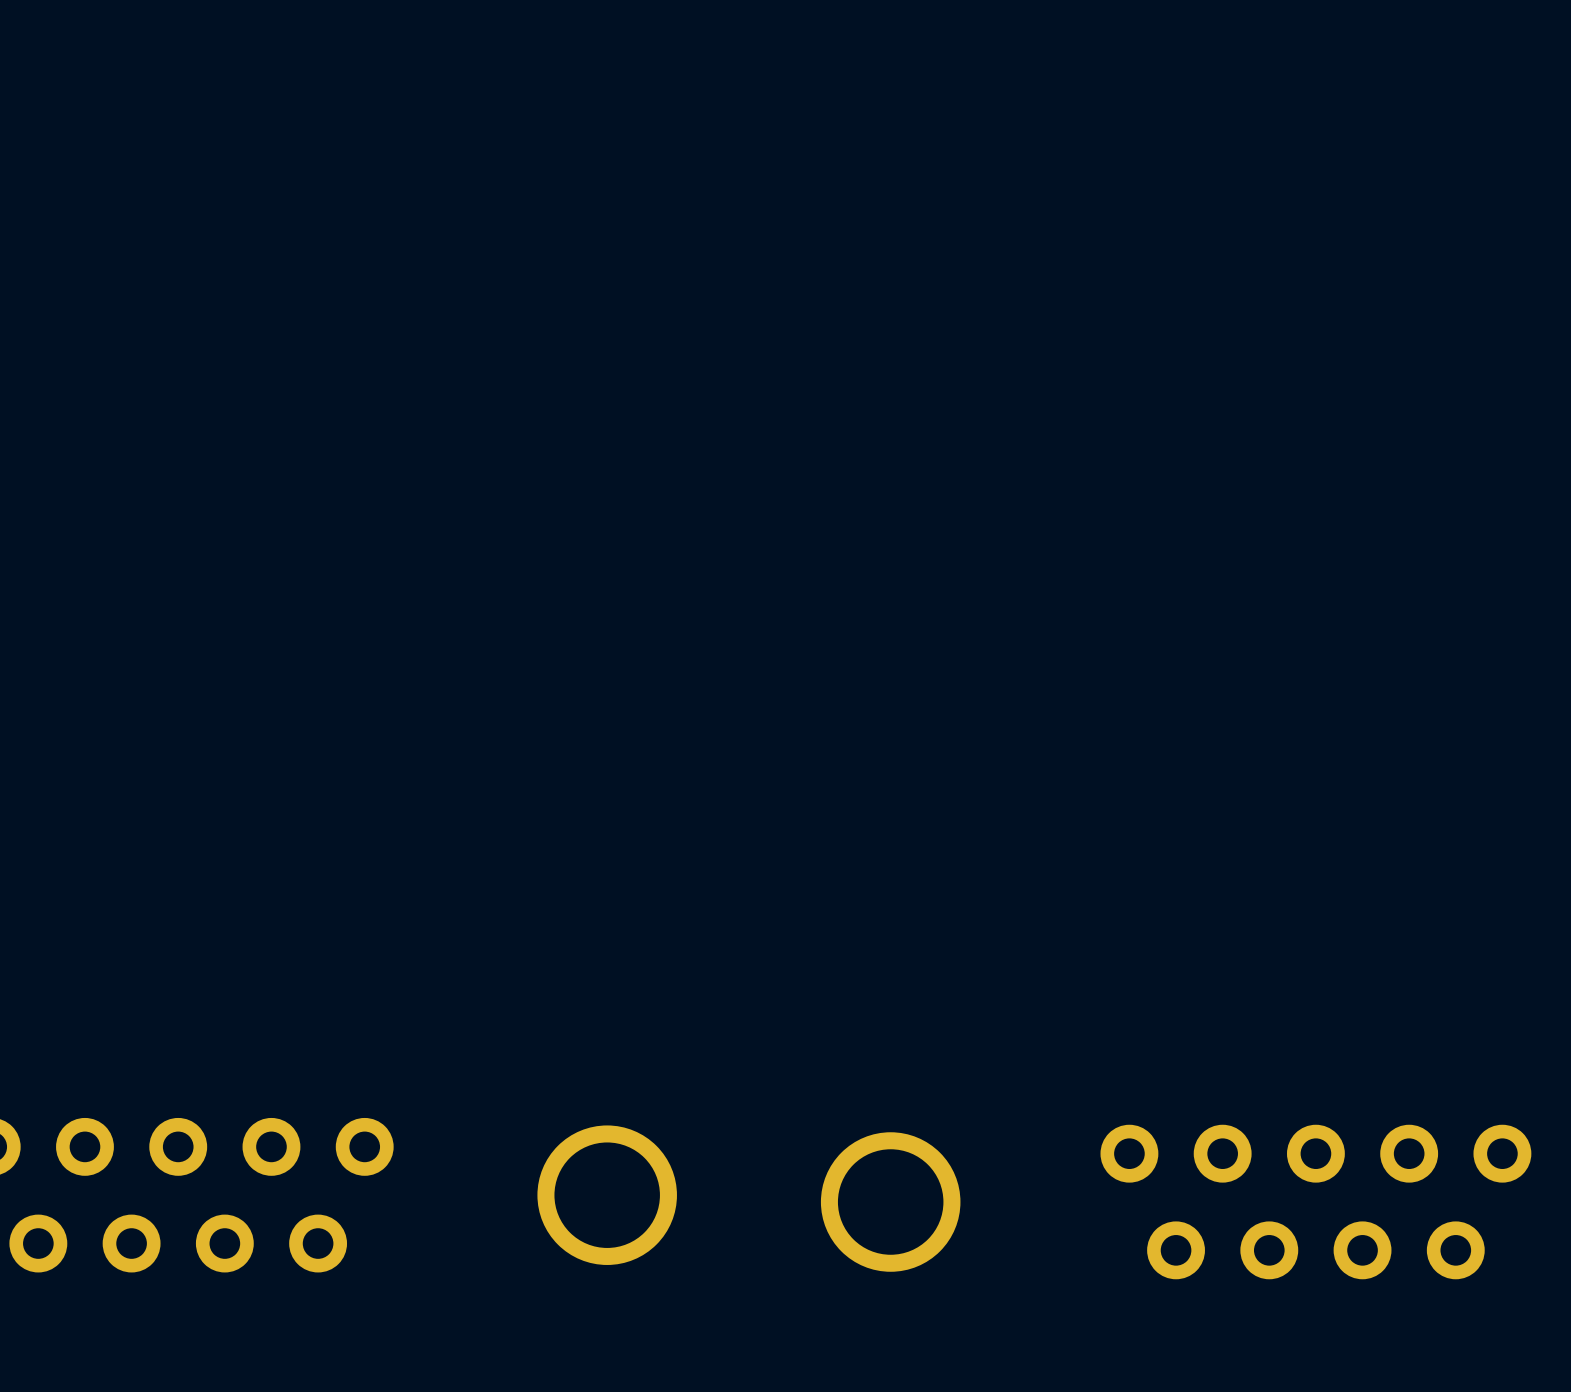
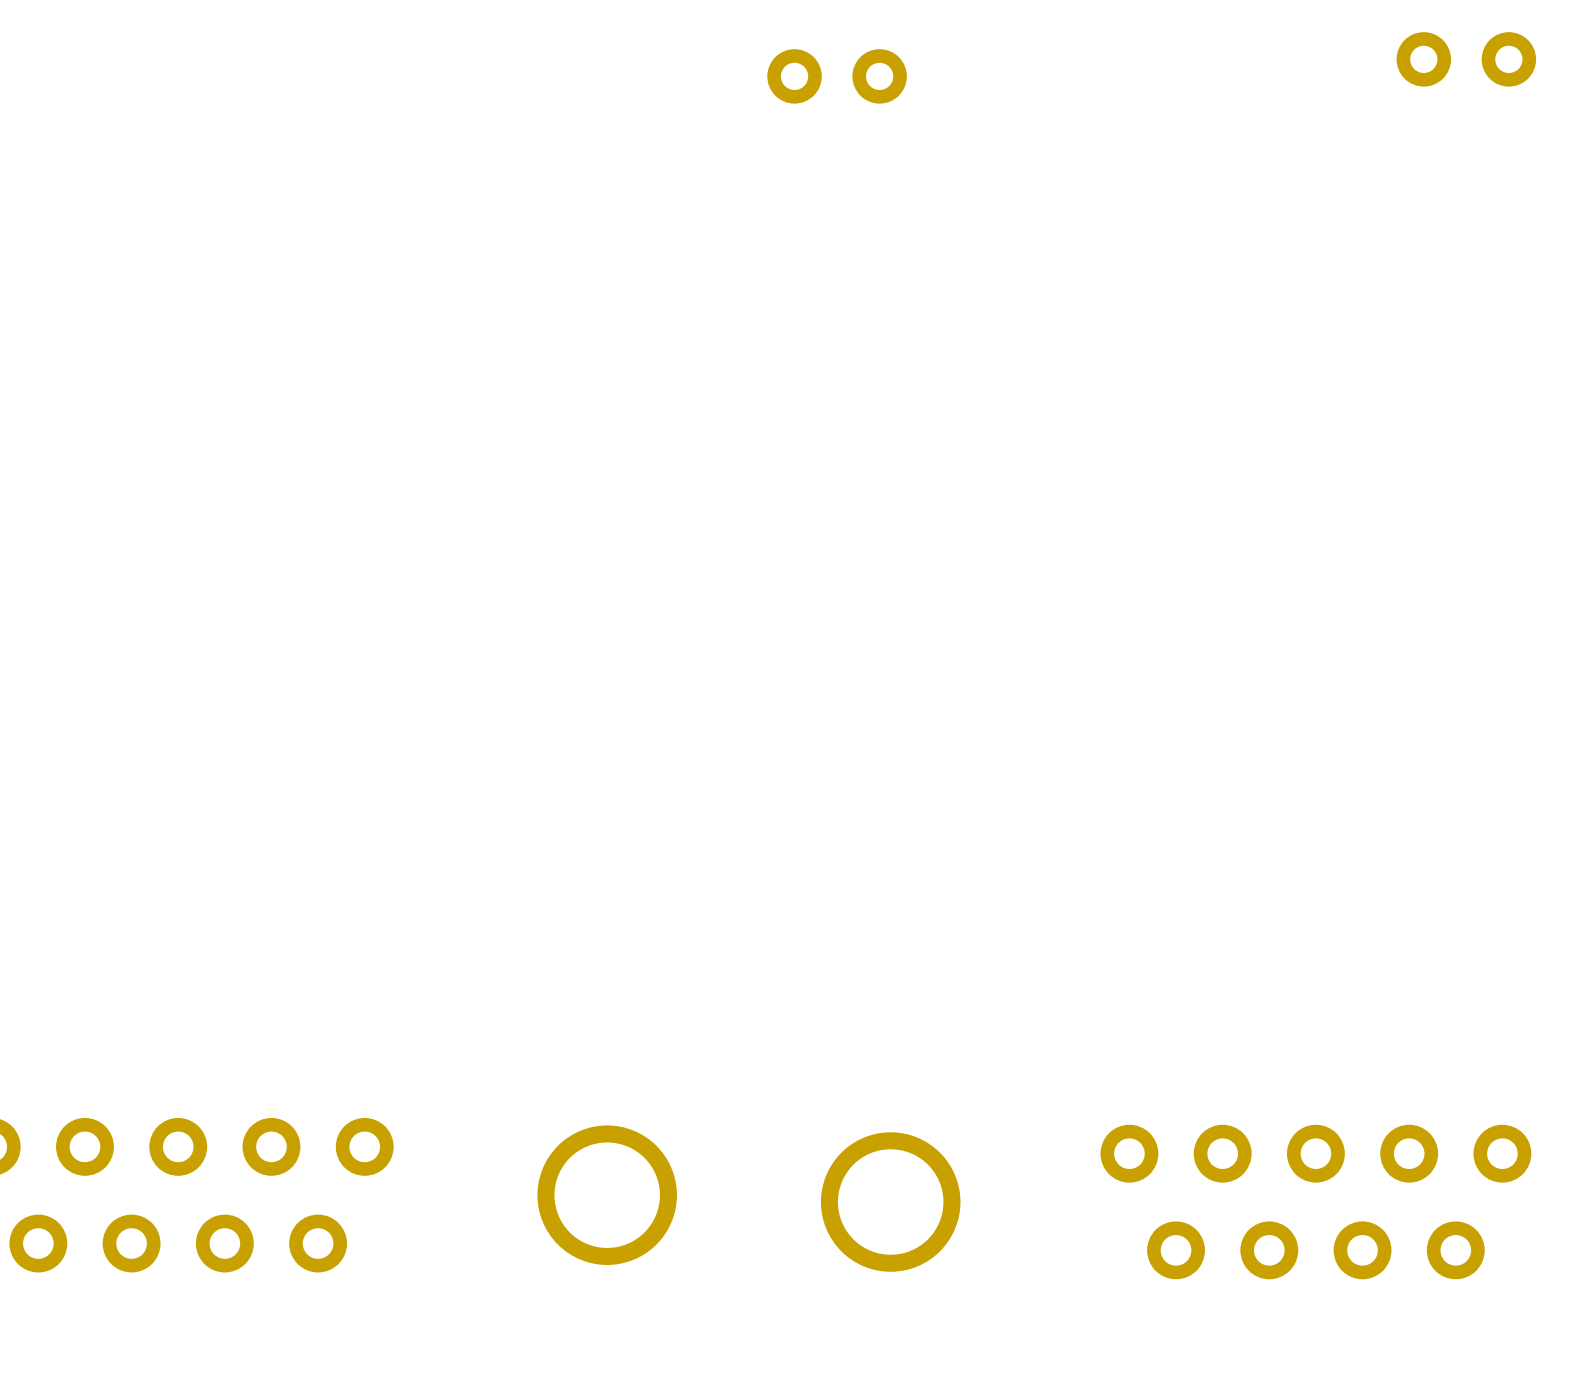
part: none -> (1466, 59)
part: none -> (837, 76)

